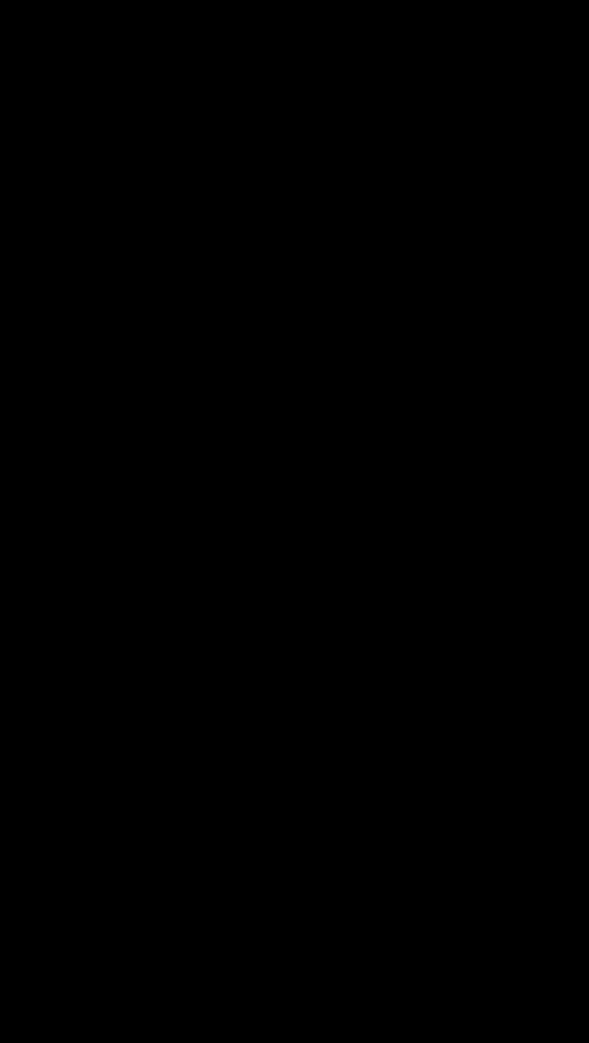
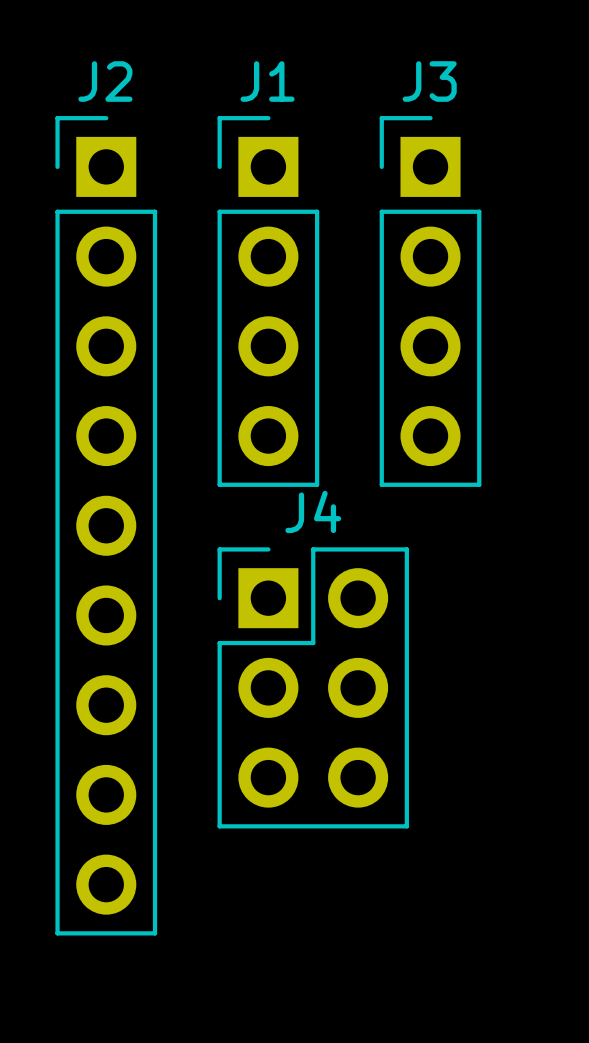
J1: none -> (268, 301)
J3: none -> (430, 301)
J2: none -> (106, 525)
J4: none -> (313, 687)

